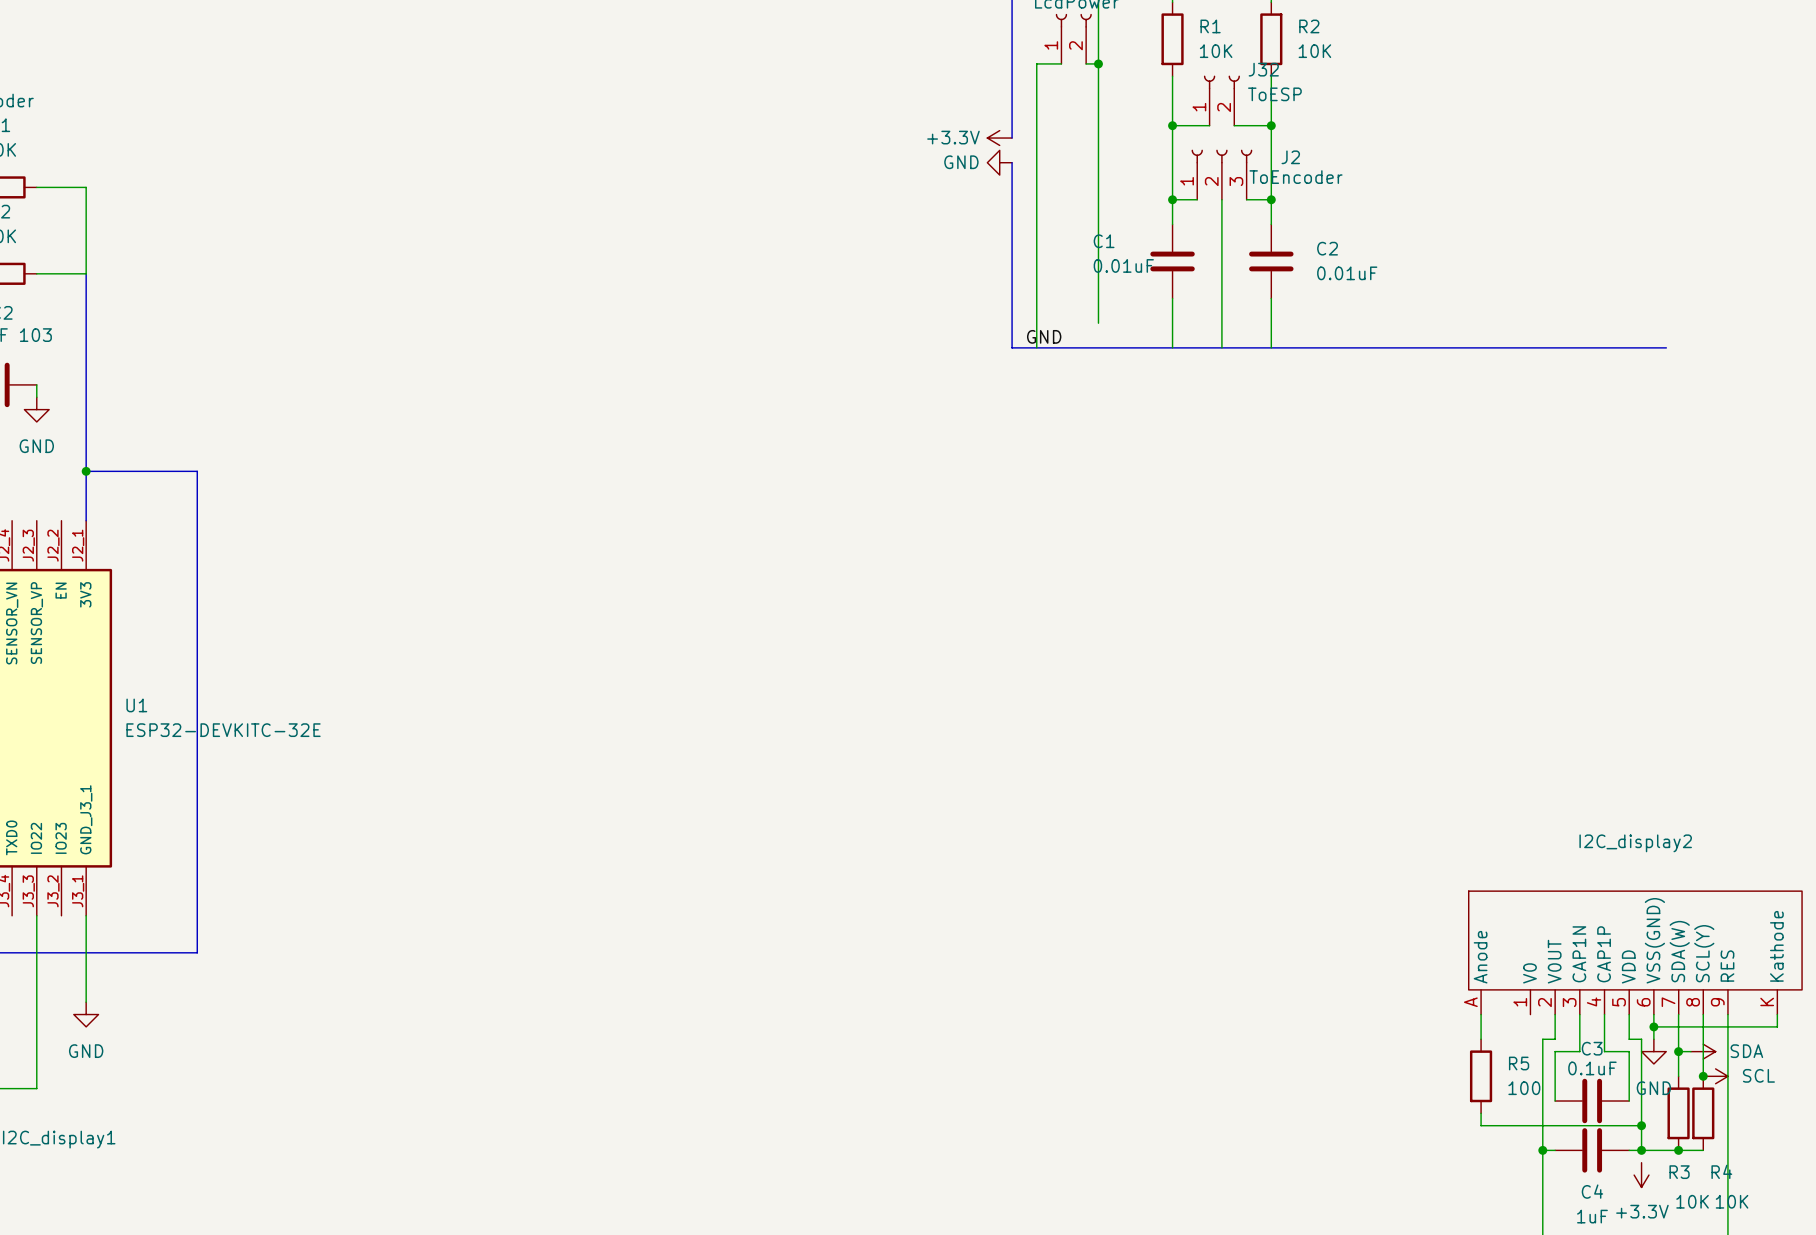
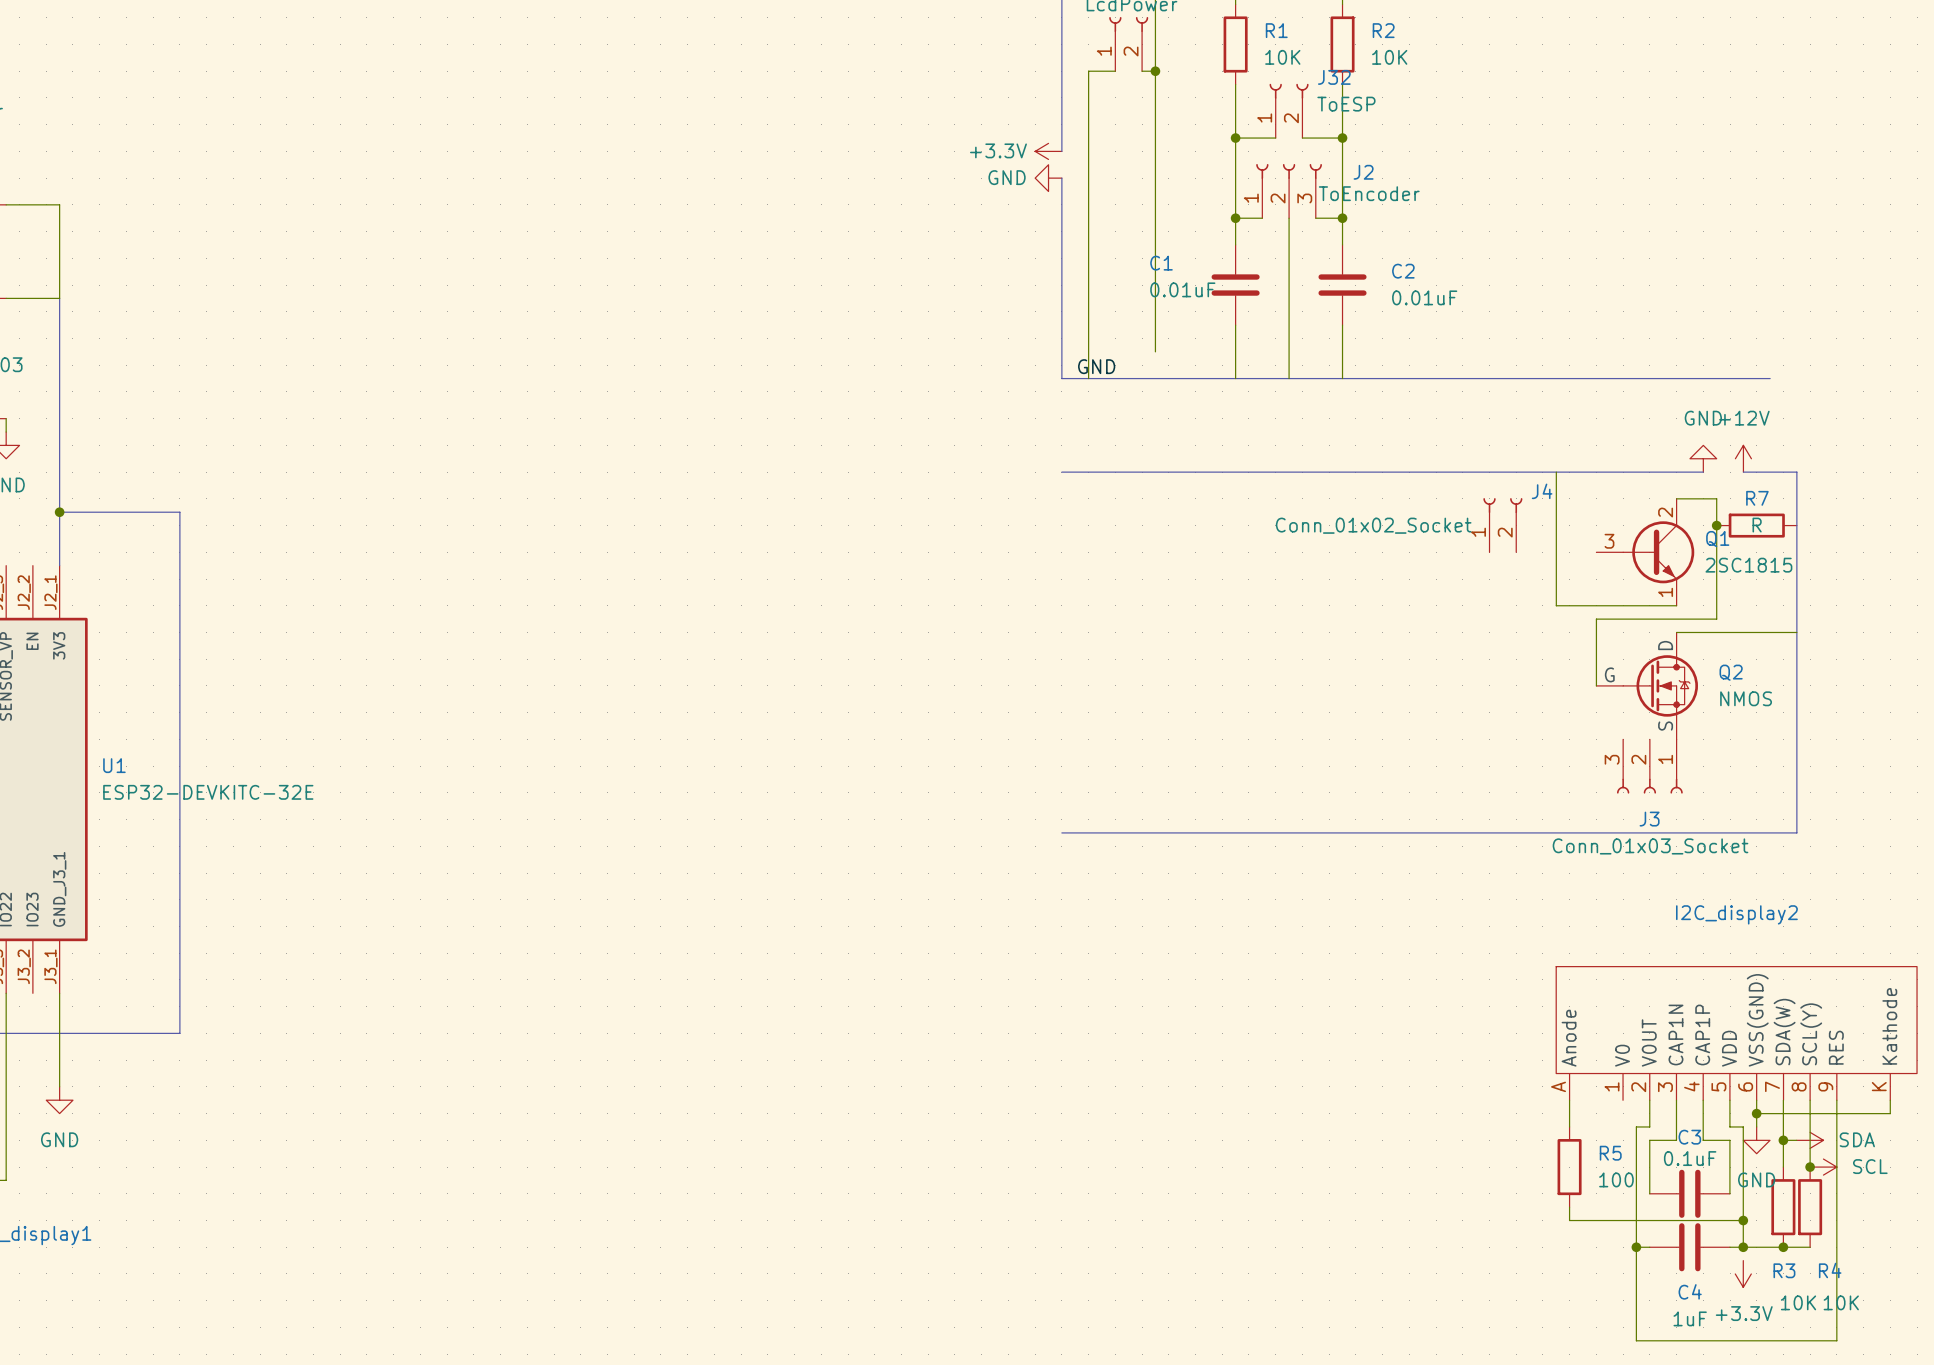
power symbol: none -> GND (1703, 458)
power symbol: none -> +12V (1743, 458)
bus: none -> (1061, 472) (1703, 472)
wire: none -> (1556, 472) (1556, 605) (1676, 605)
bus: none -> (1743, 472) (1796, 472) (1796, 832) (1061, 832)
wire: none -> (1676, 498) (1716, 498) (1716, 619) (1596, 619) (1596, 685)
J4: none -> Conn_01x02_Socket (1502, 525)
junction: none -> (1716, 525)
R7: none -> R (1756, 525)
Q1: none -> 2SC1815 (1645, 552)
wire: none -> (1676, 632) (1796, 632)
Q2: none -> NMOS (1647, 685)
J3: none -> Conn_01x03_Socket (1649, 766)

